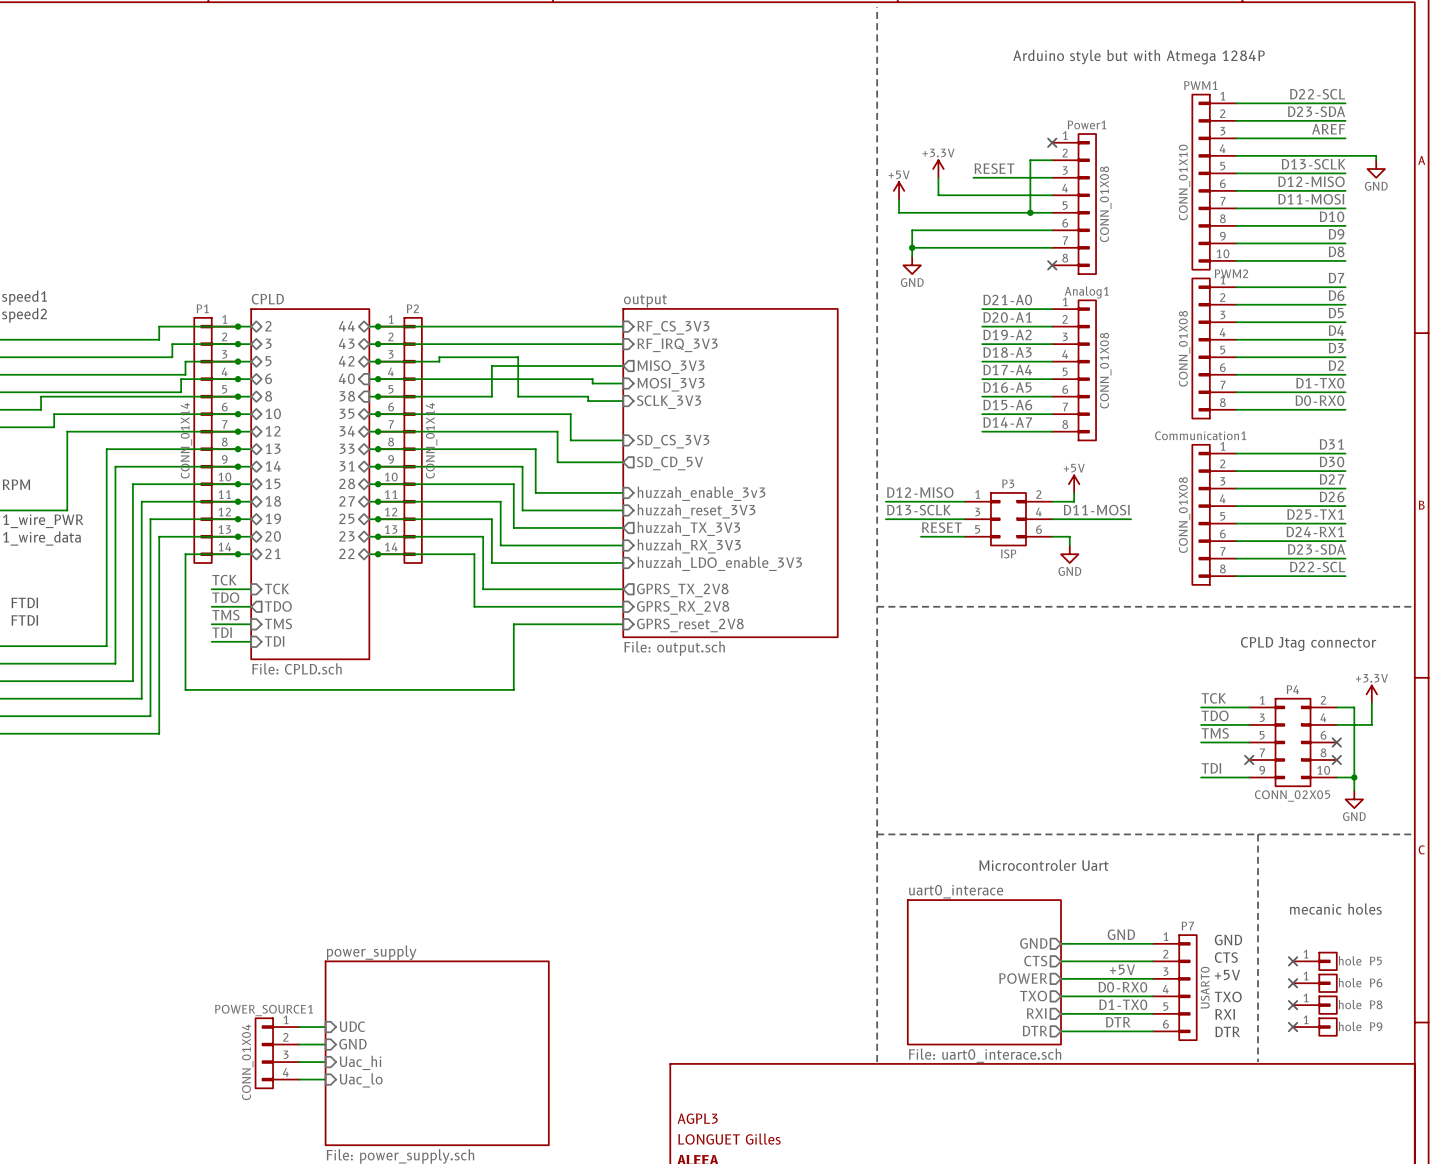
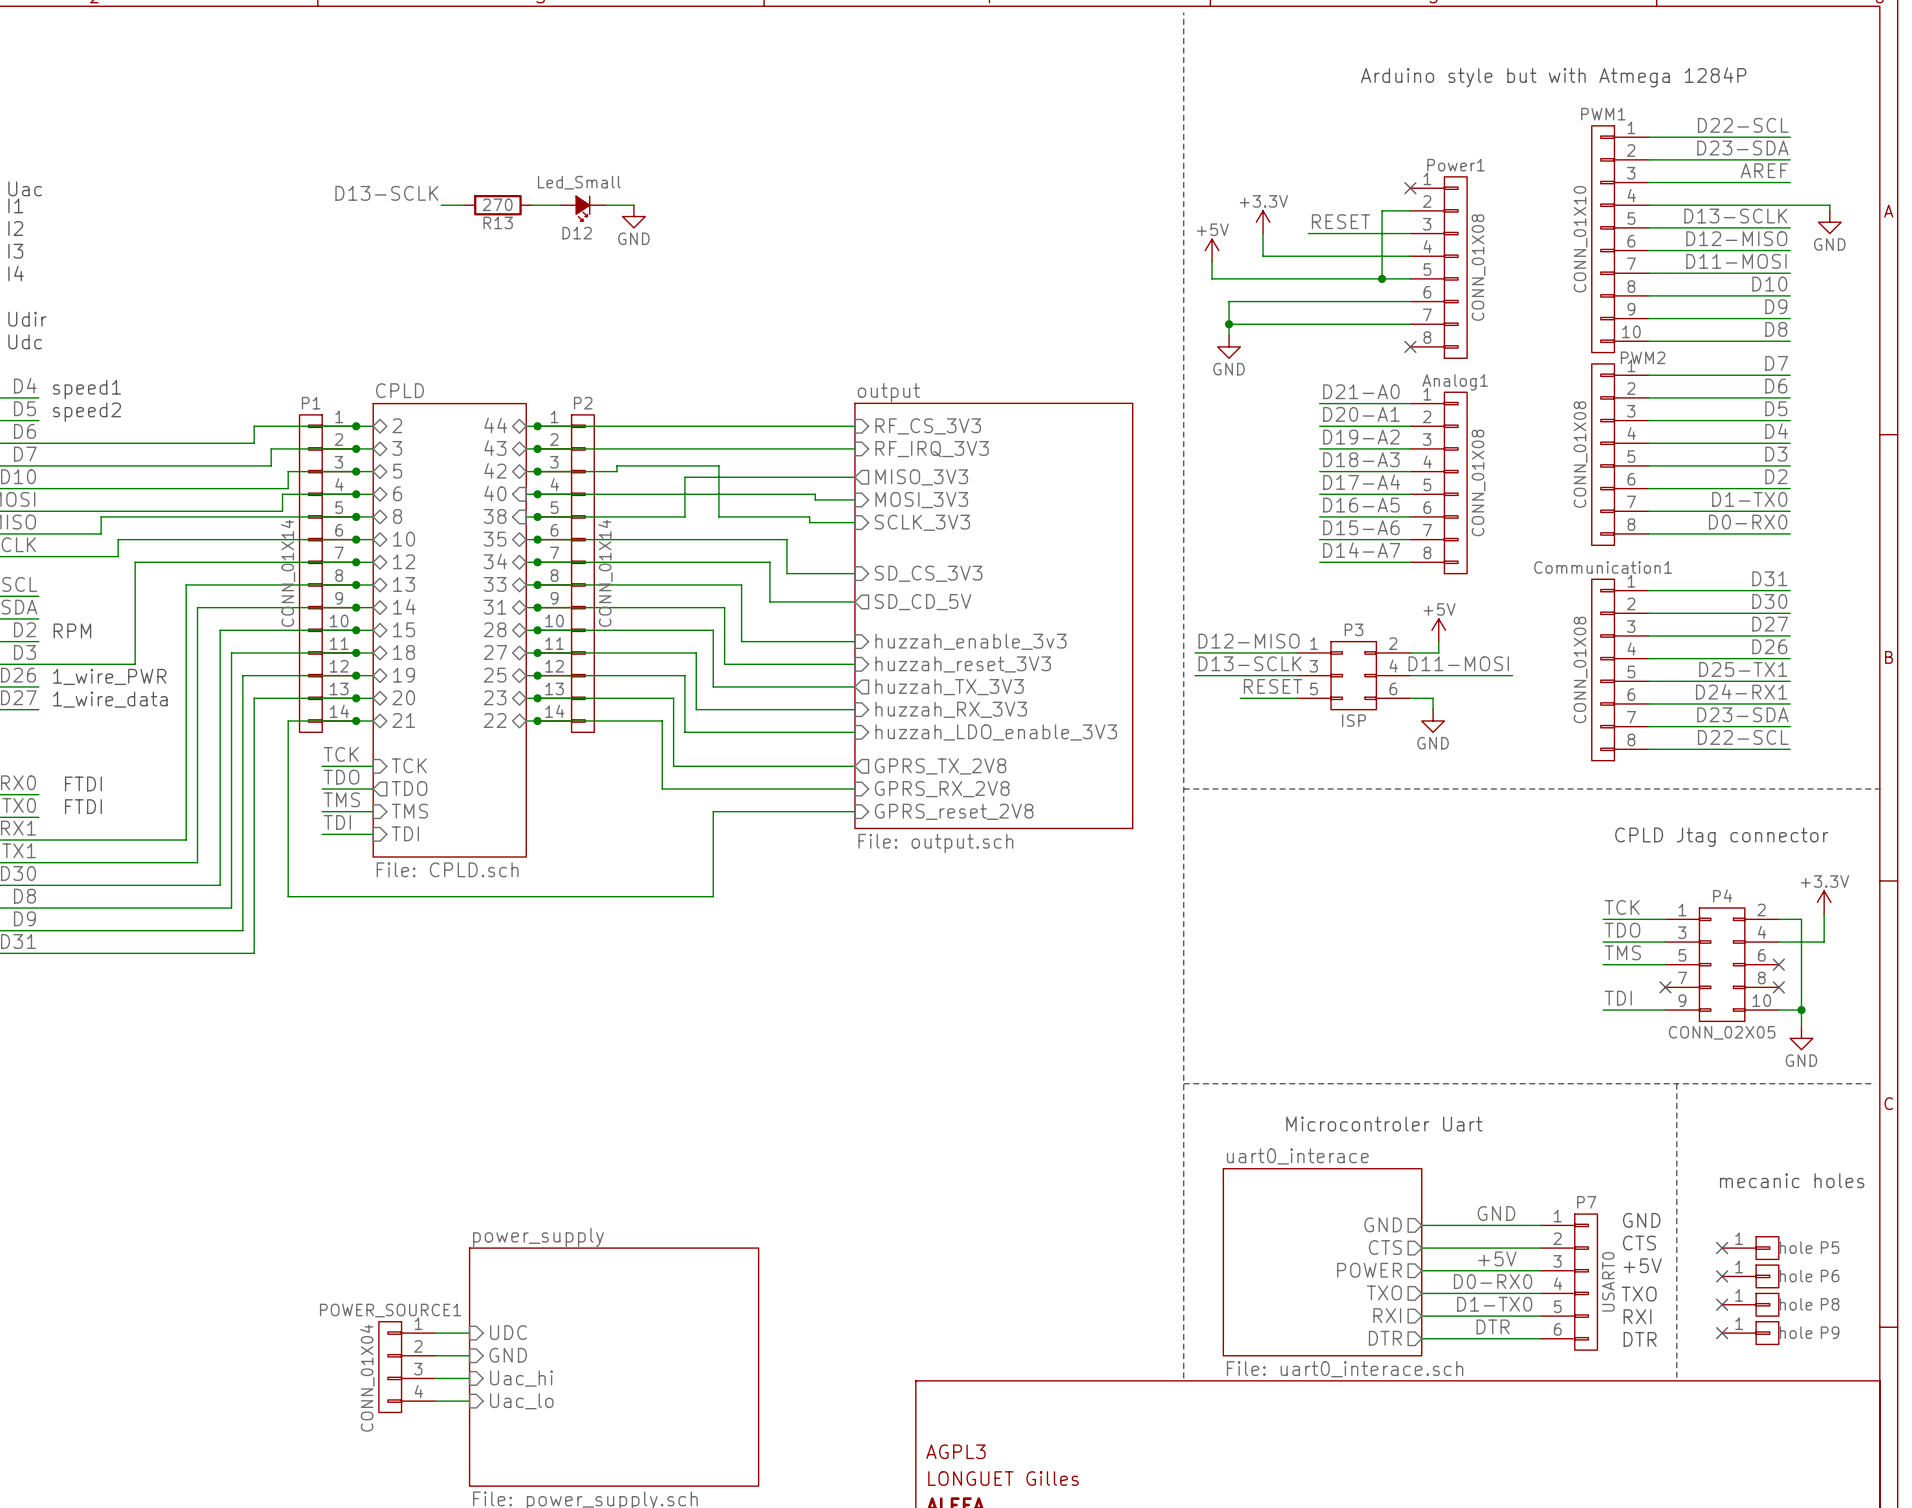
label: none -> D13-SCLK (386, 193)
wire: none -> (441, 205) (463, 205)
R13: none -> 270 (497, 205)
wire: none -> (531, 205) (560, 205)
wire: none -> (605, 205) (633, 205)
D12: none -> Led_Small (582, 208)
power symbol: none -> GND (633, 216)

